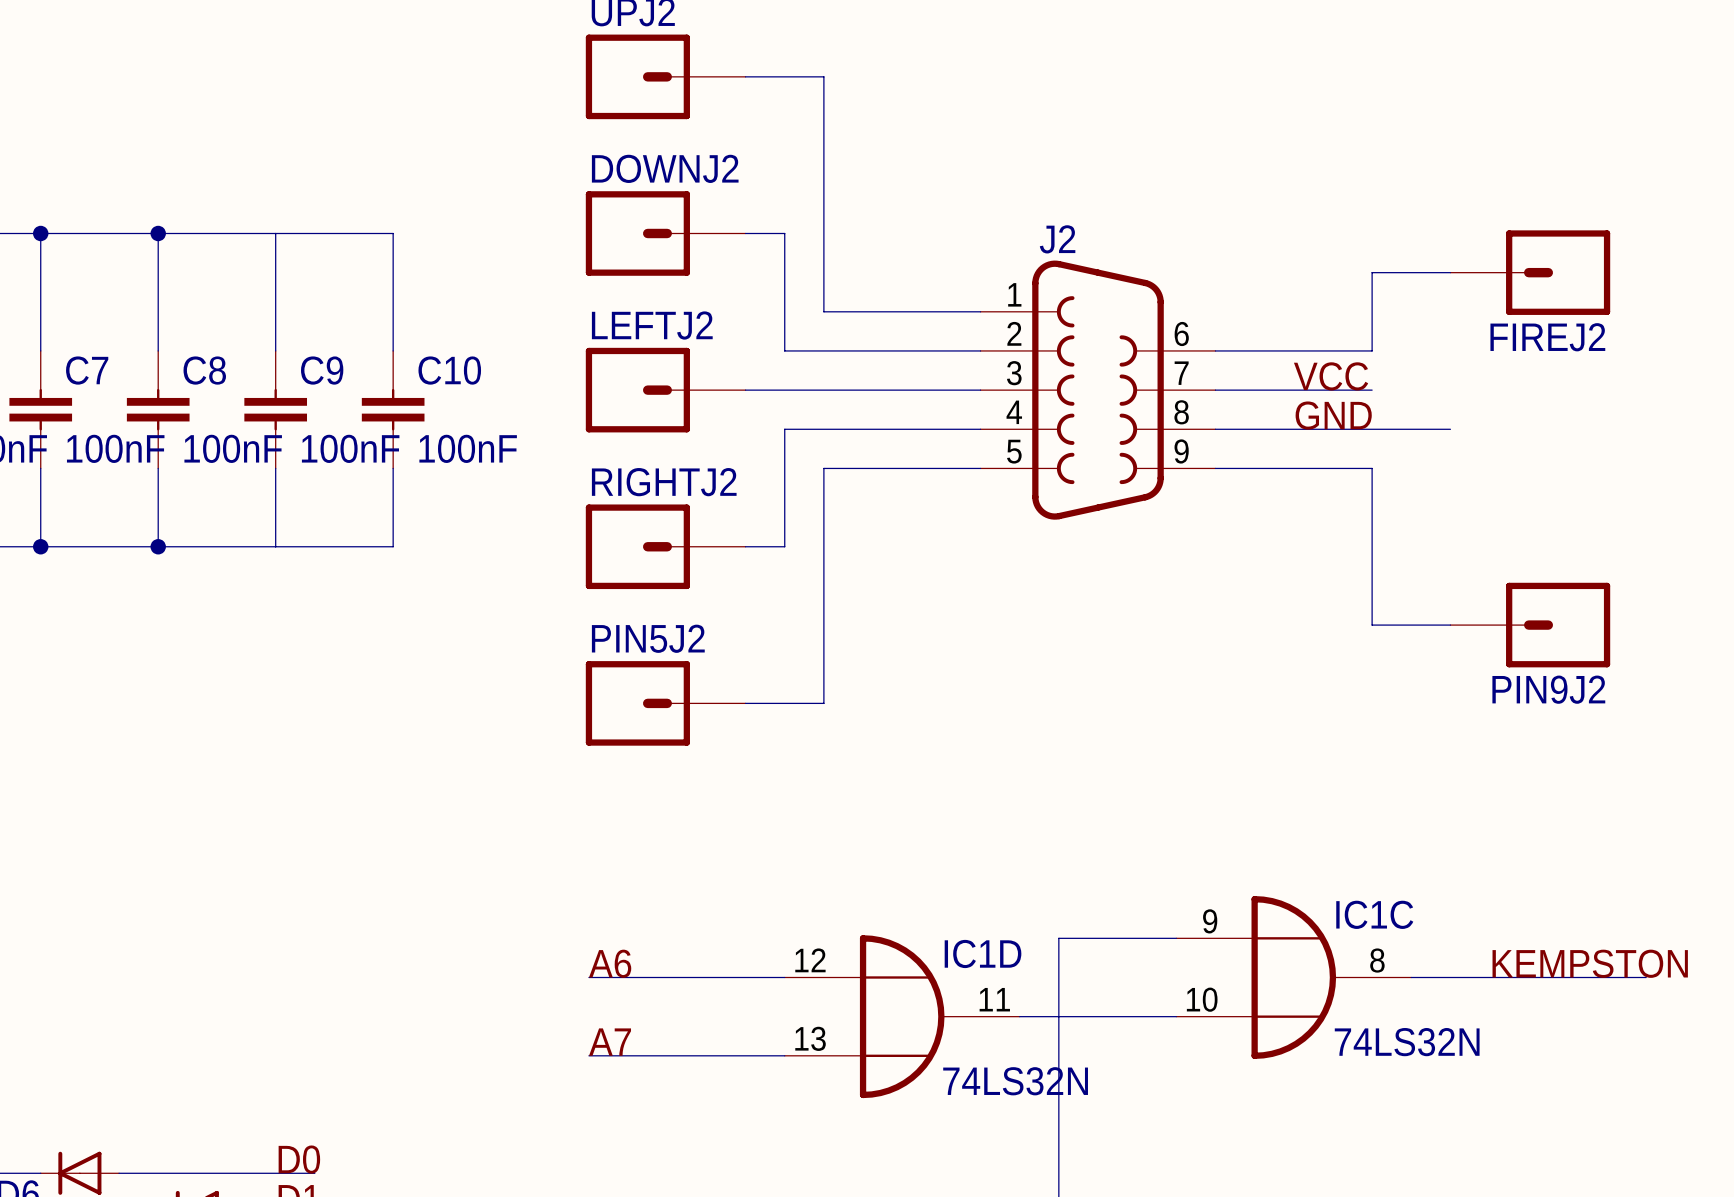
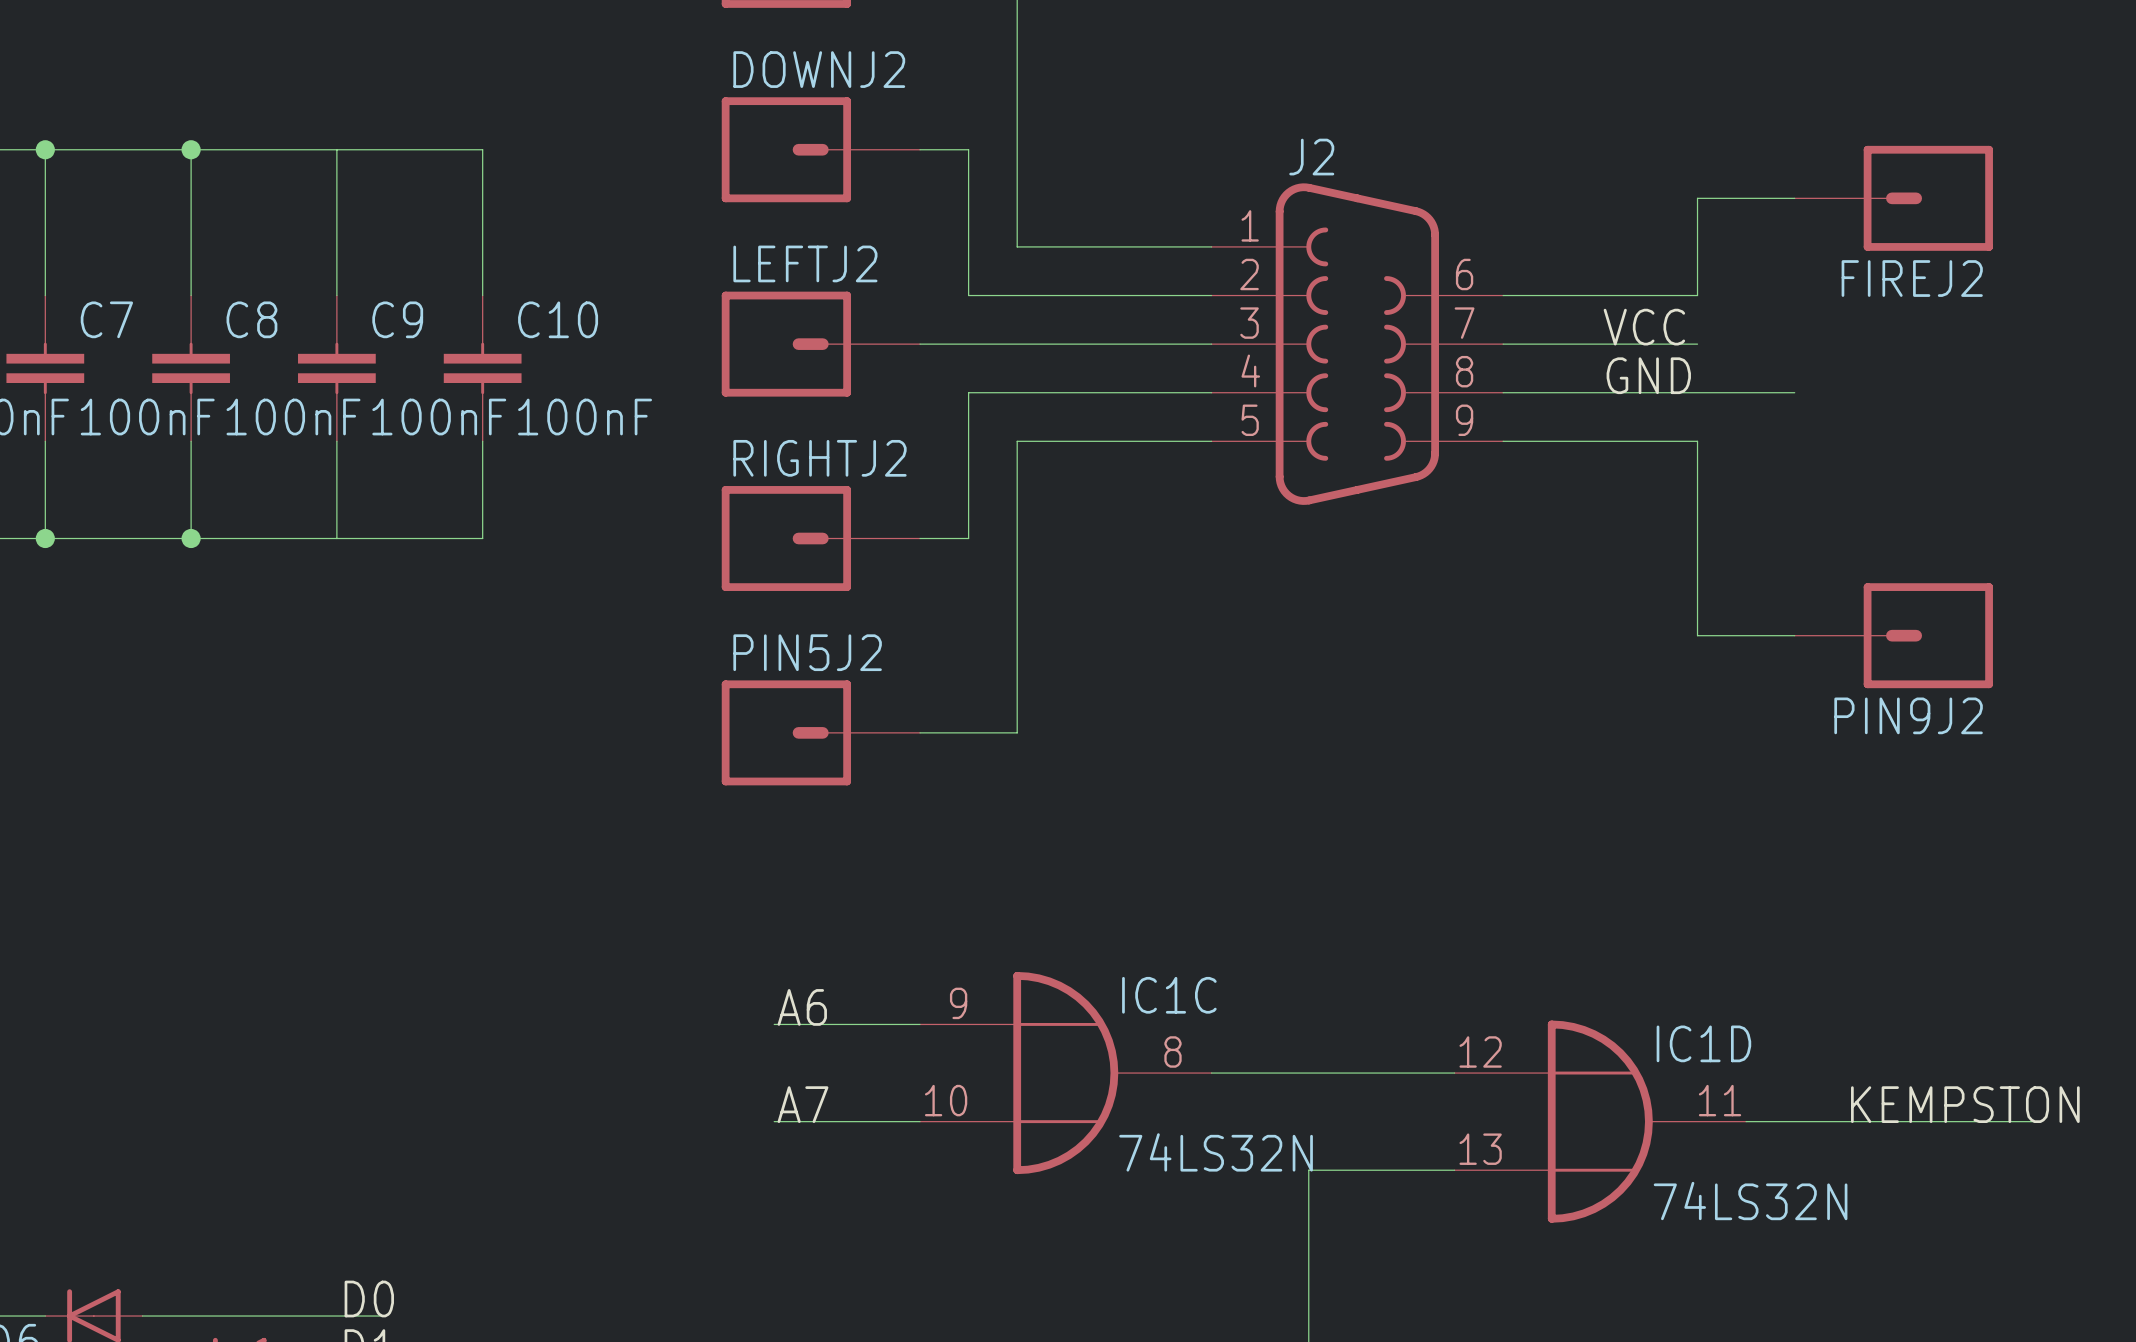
wire: none -> (774, 1024) (920, 1024)
wire: (1176, 938) (1058, 938) (1058, 1055) -> (1454, 1170) (1308, 1170)
label position: A6 (610, 963) -> A6 (802, 1007)
label position: KEMPSTON (1590, 963) -> KEMPSTON (1965, 1104)
wire: (588, 977) (784, 977) -> none
wire: none -> (1211, 1073) (1454, 1073)
IC1C position: (1293, 977) -> (1065, 1073)
wire: (1411, 977) (1646, 977) -> (1746, 1121) (2037, 1121)
wire: none -> (774, 1121) (920, 1121)
IC1D position: (902, 1016) -> (1600, 1121)
wire: (1019, 1016) (1176, 1016) -> none
label position: A7 (610, 1042) -> A7 (802, 1104)
wire: (588, 1055) (784, 1055) -> none

